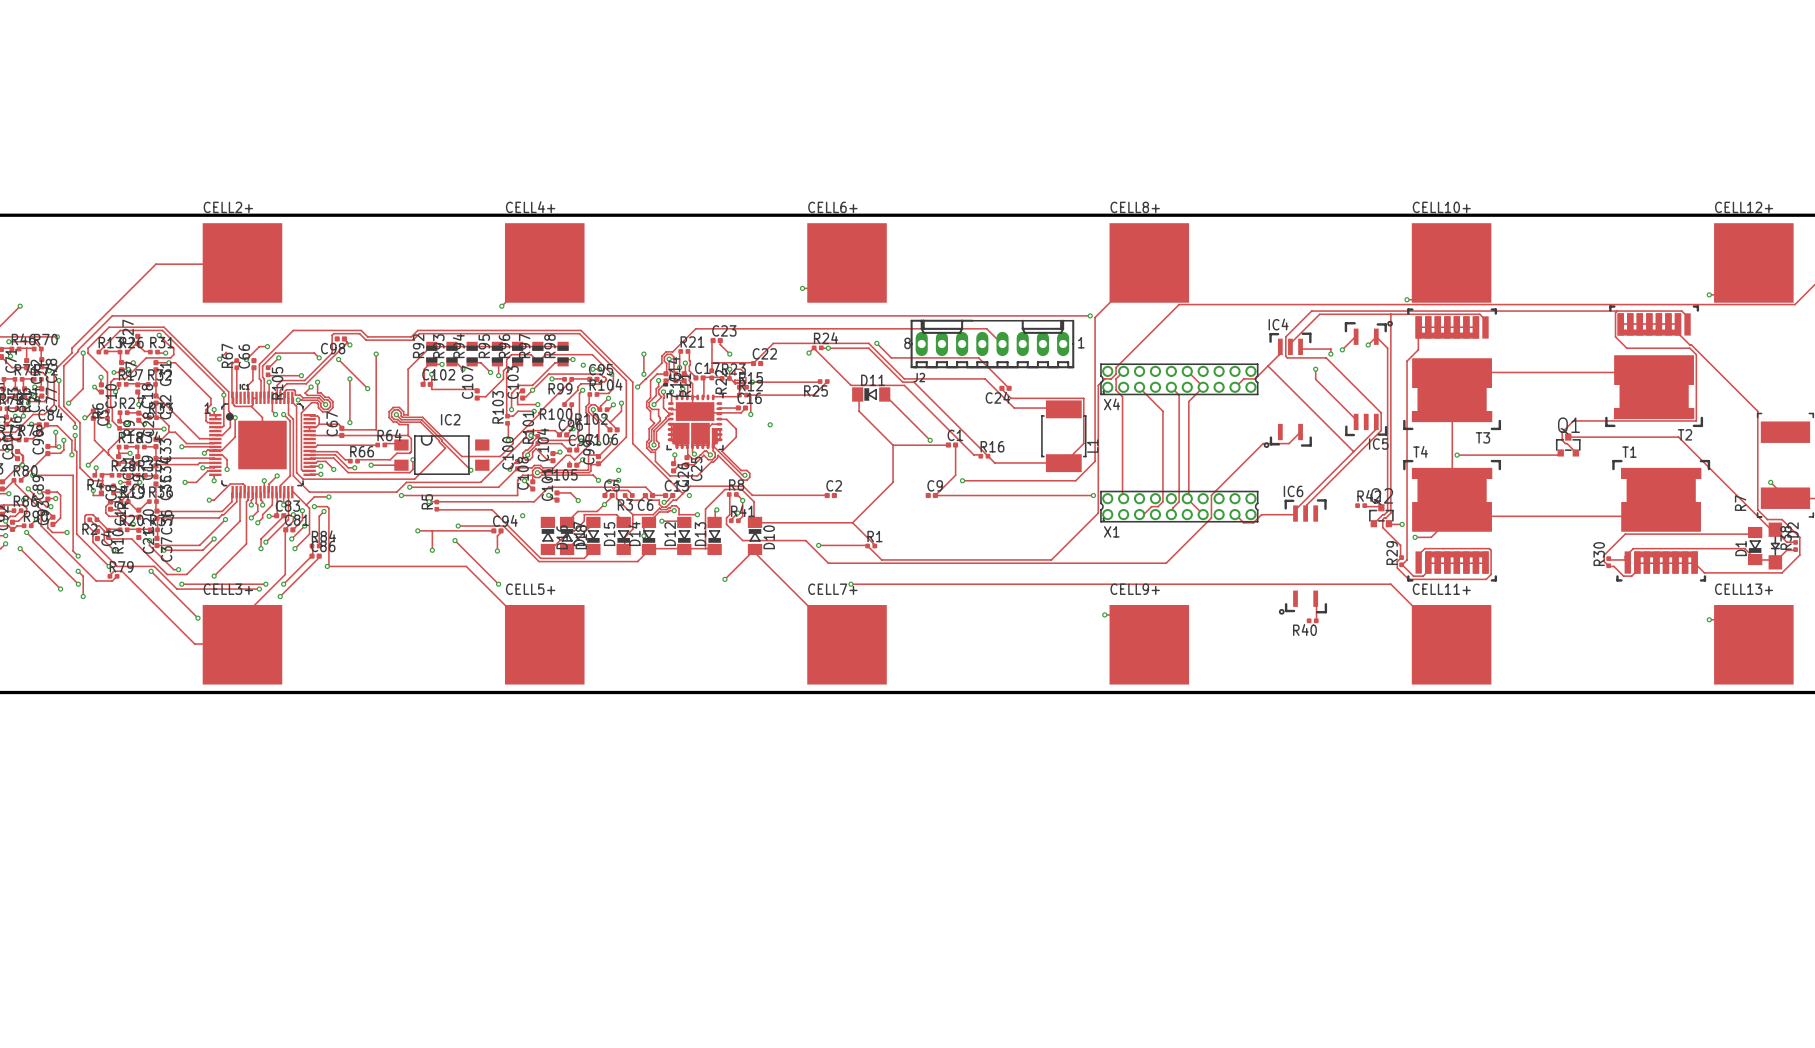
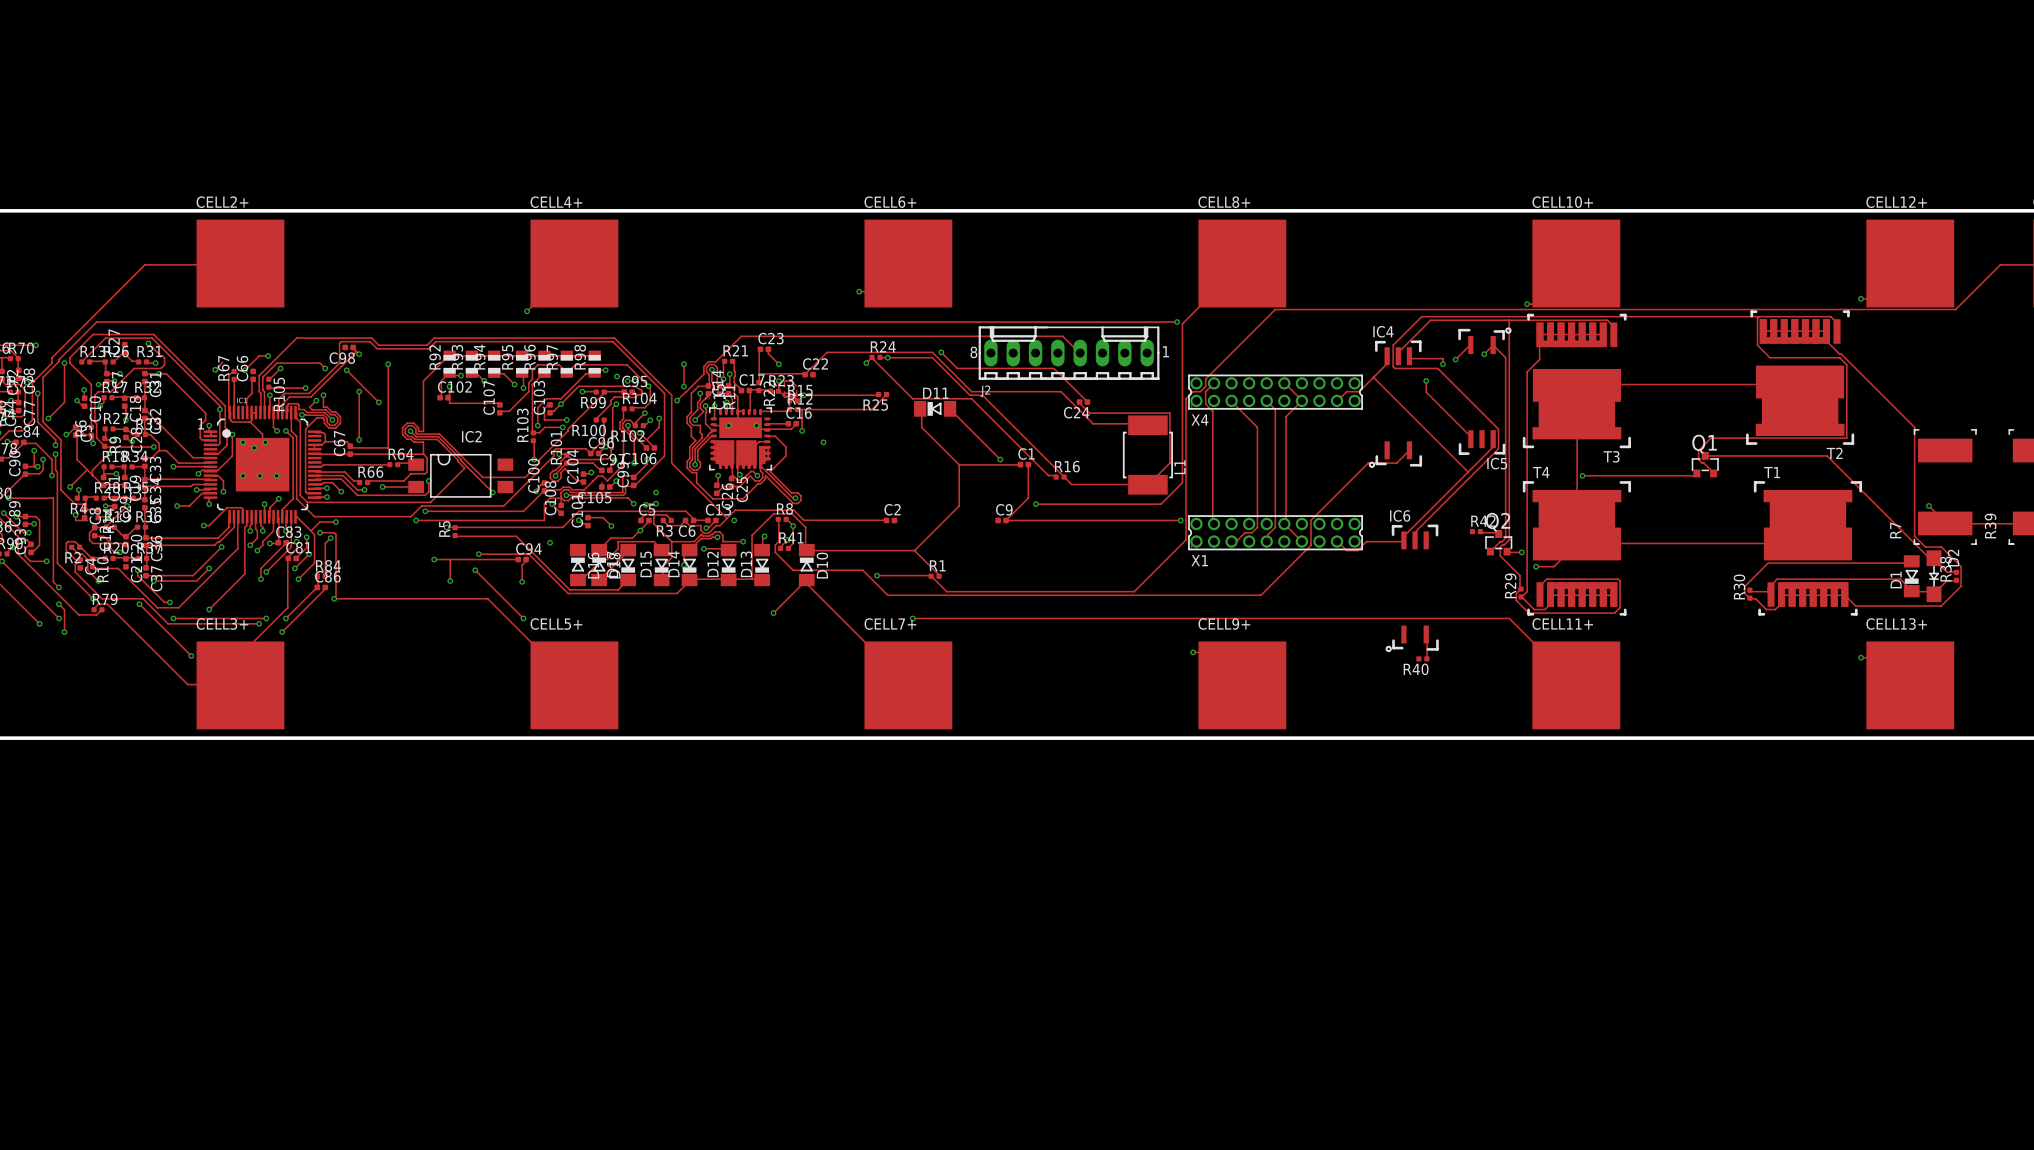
via: none -> (728, 425)
via: none -> (756, 425)
via: none -> (243, 442)
via: none -> (265, 442)
via: none -> (254, 447)
via: none -> (243, 475)
via: none -> (259, 475)
via: none -> (276, 475)

